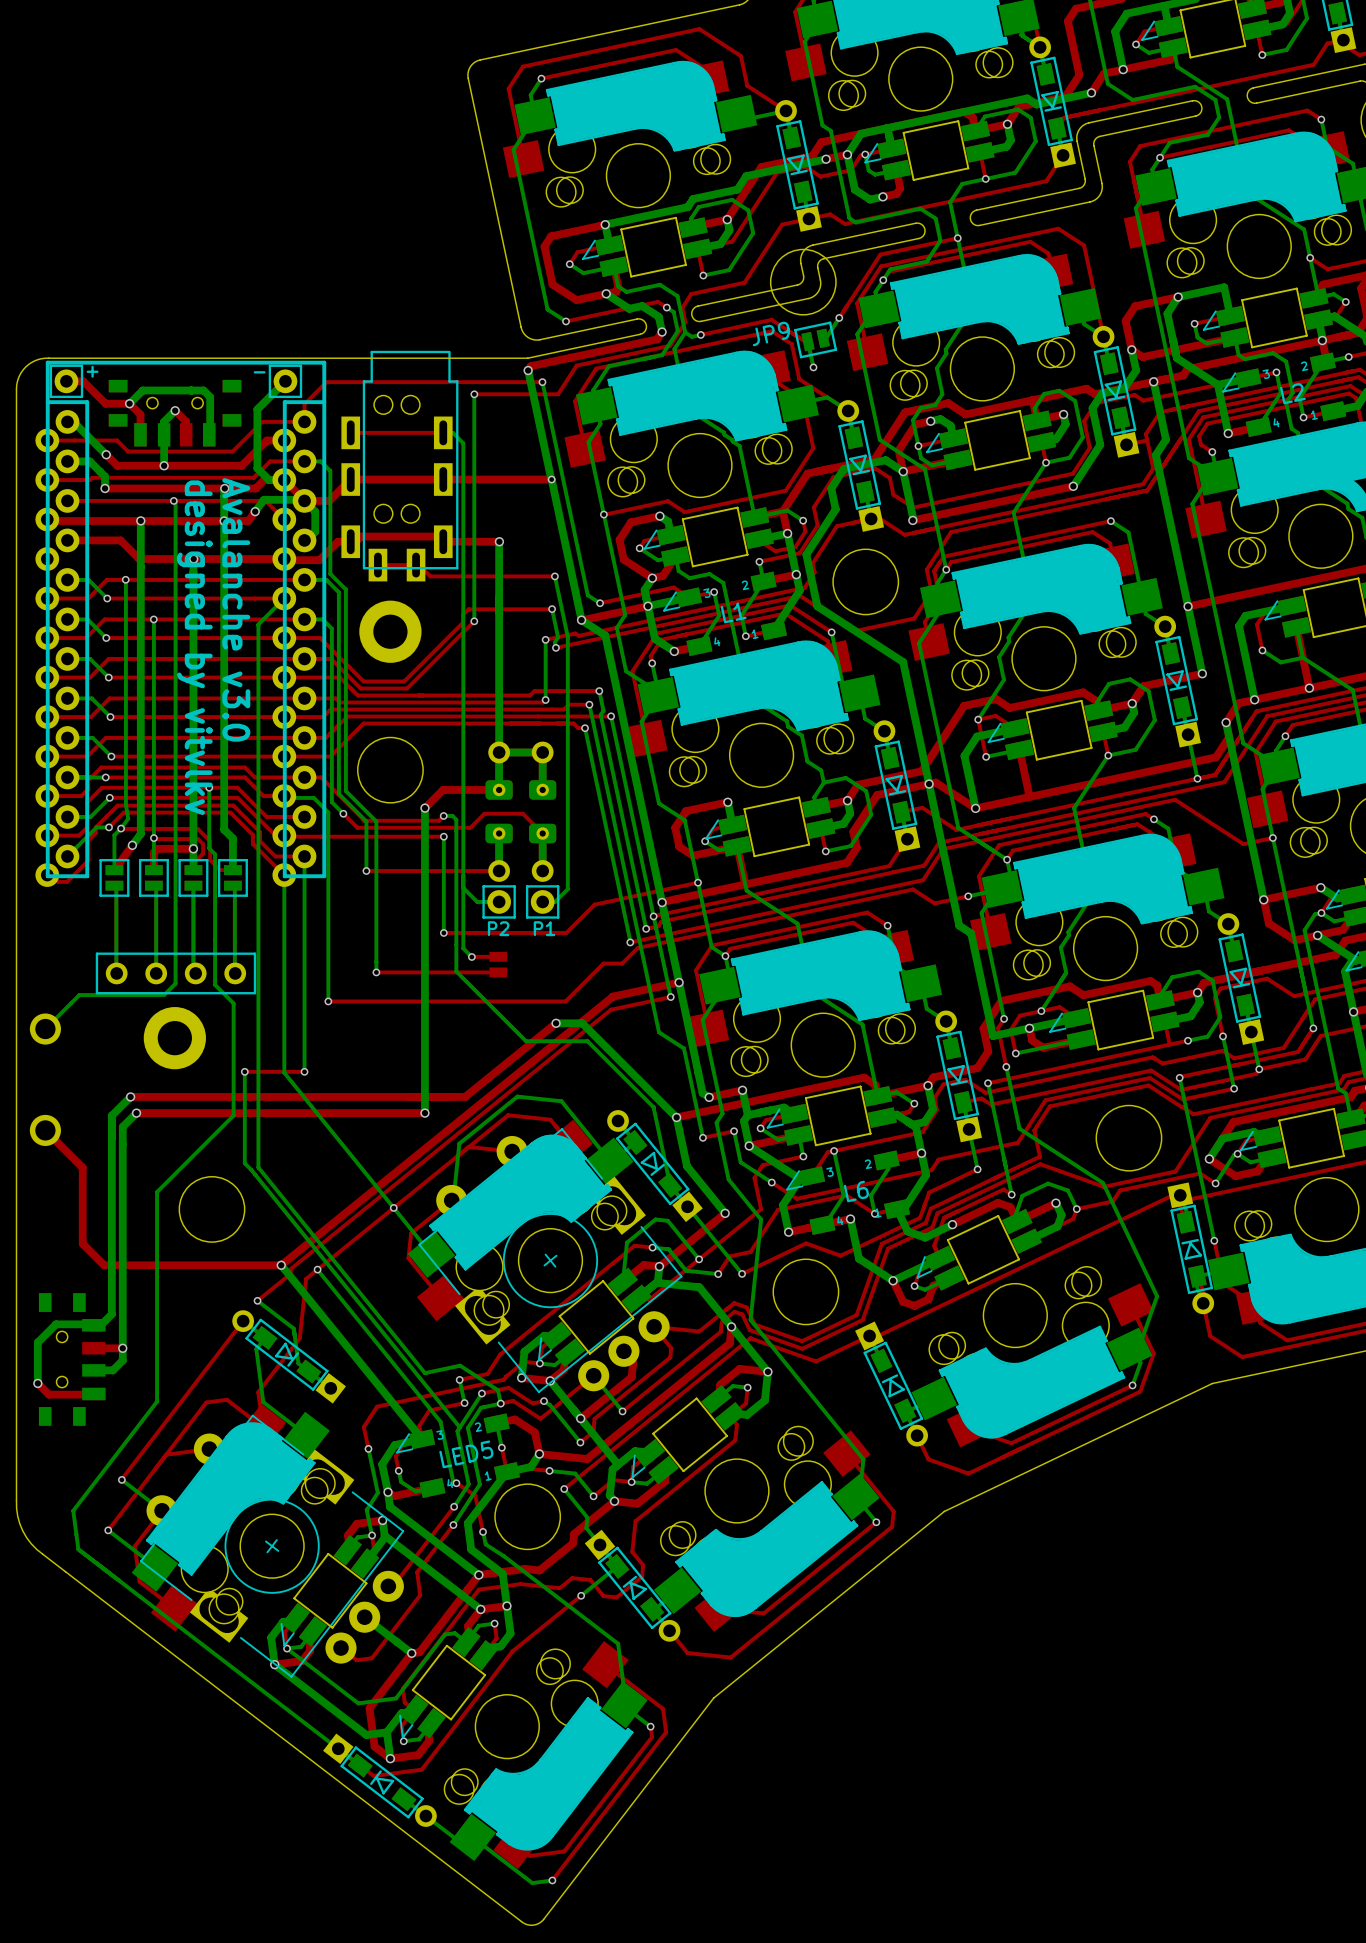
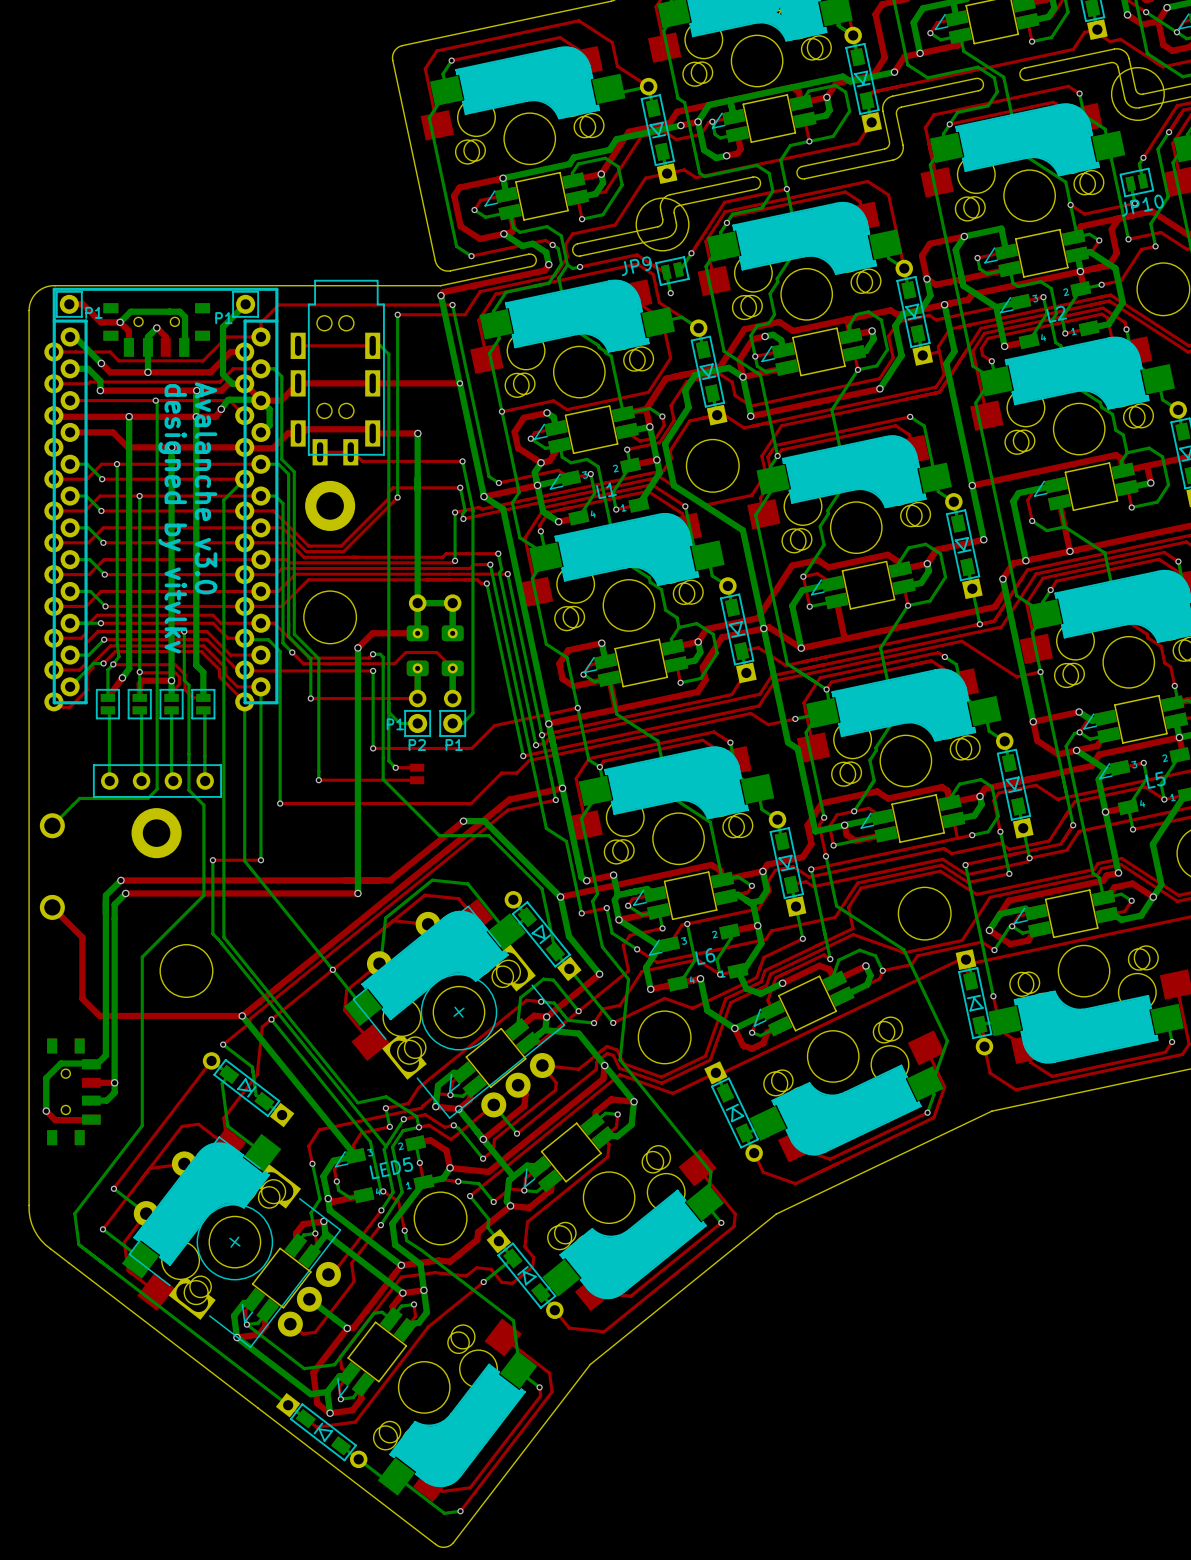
part text: + (92, 371) -> none
part text: - (259, 372) -> none
part text: none -> P1 (93, 312)
part text: none -> P1 (223, 318)
part text: none -> P1 (395, 724)

